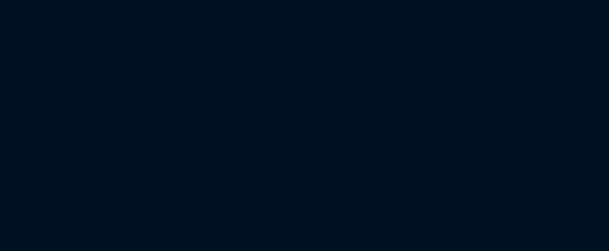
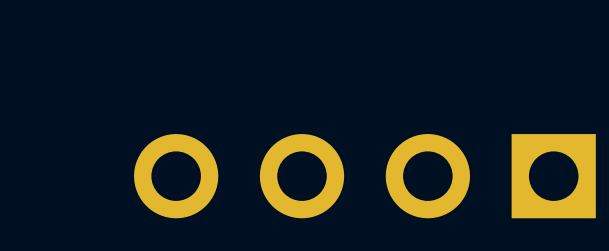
part: none -> (364, 176)

